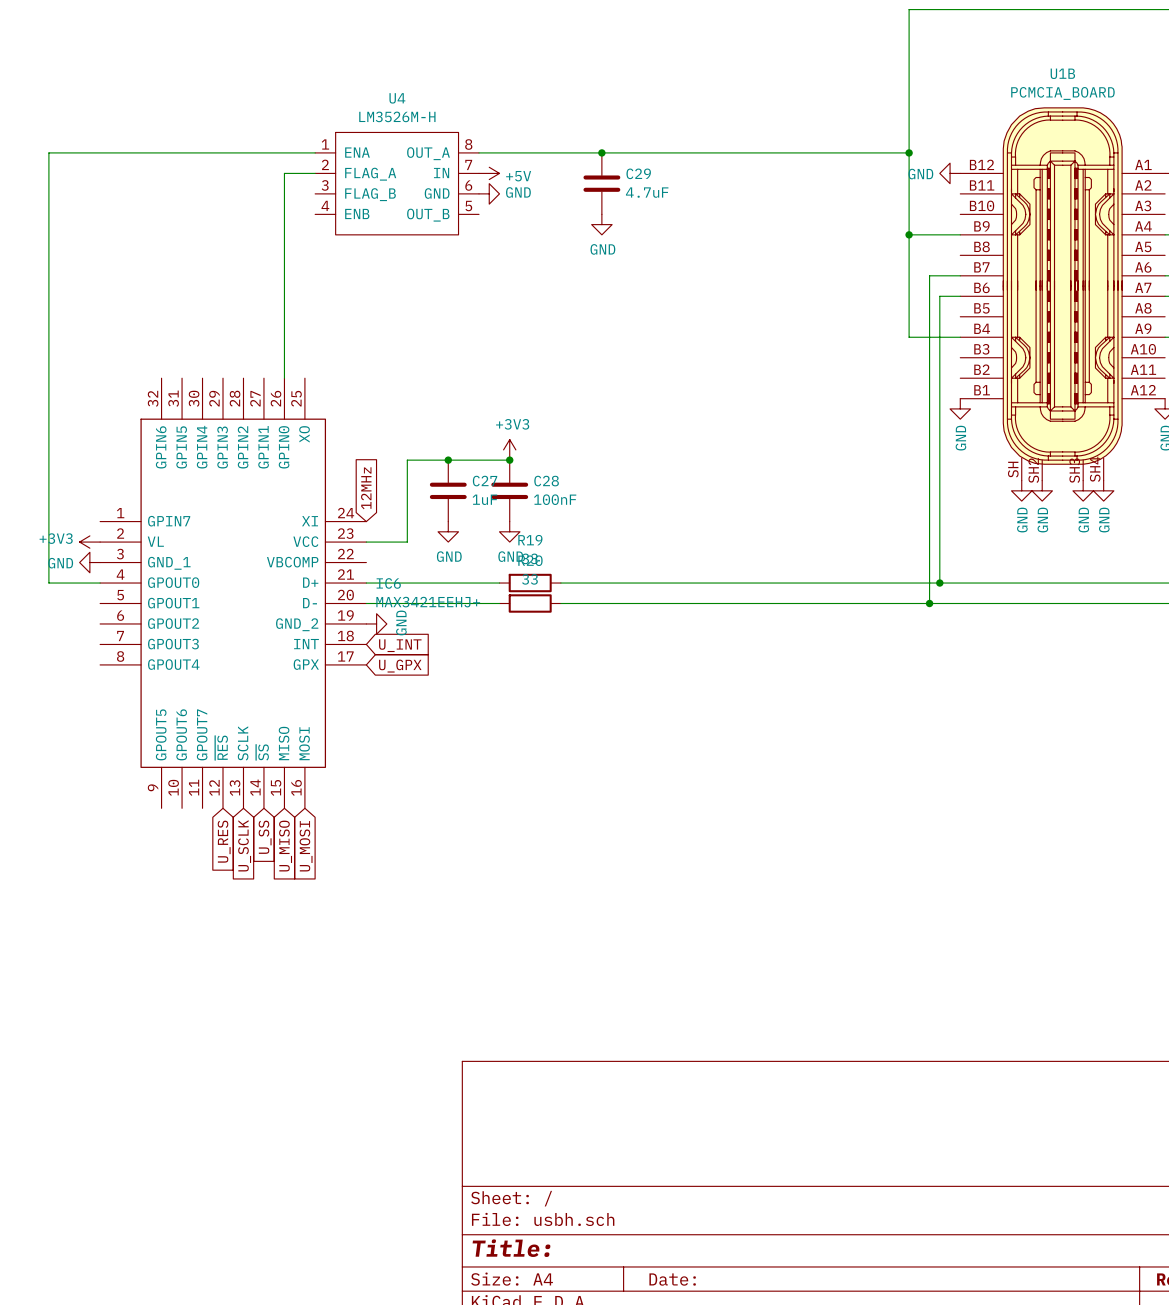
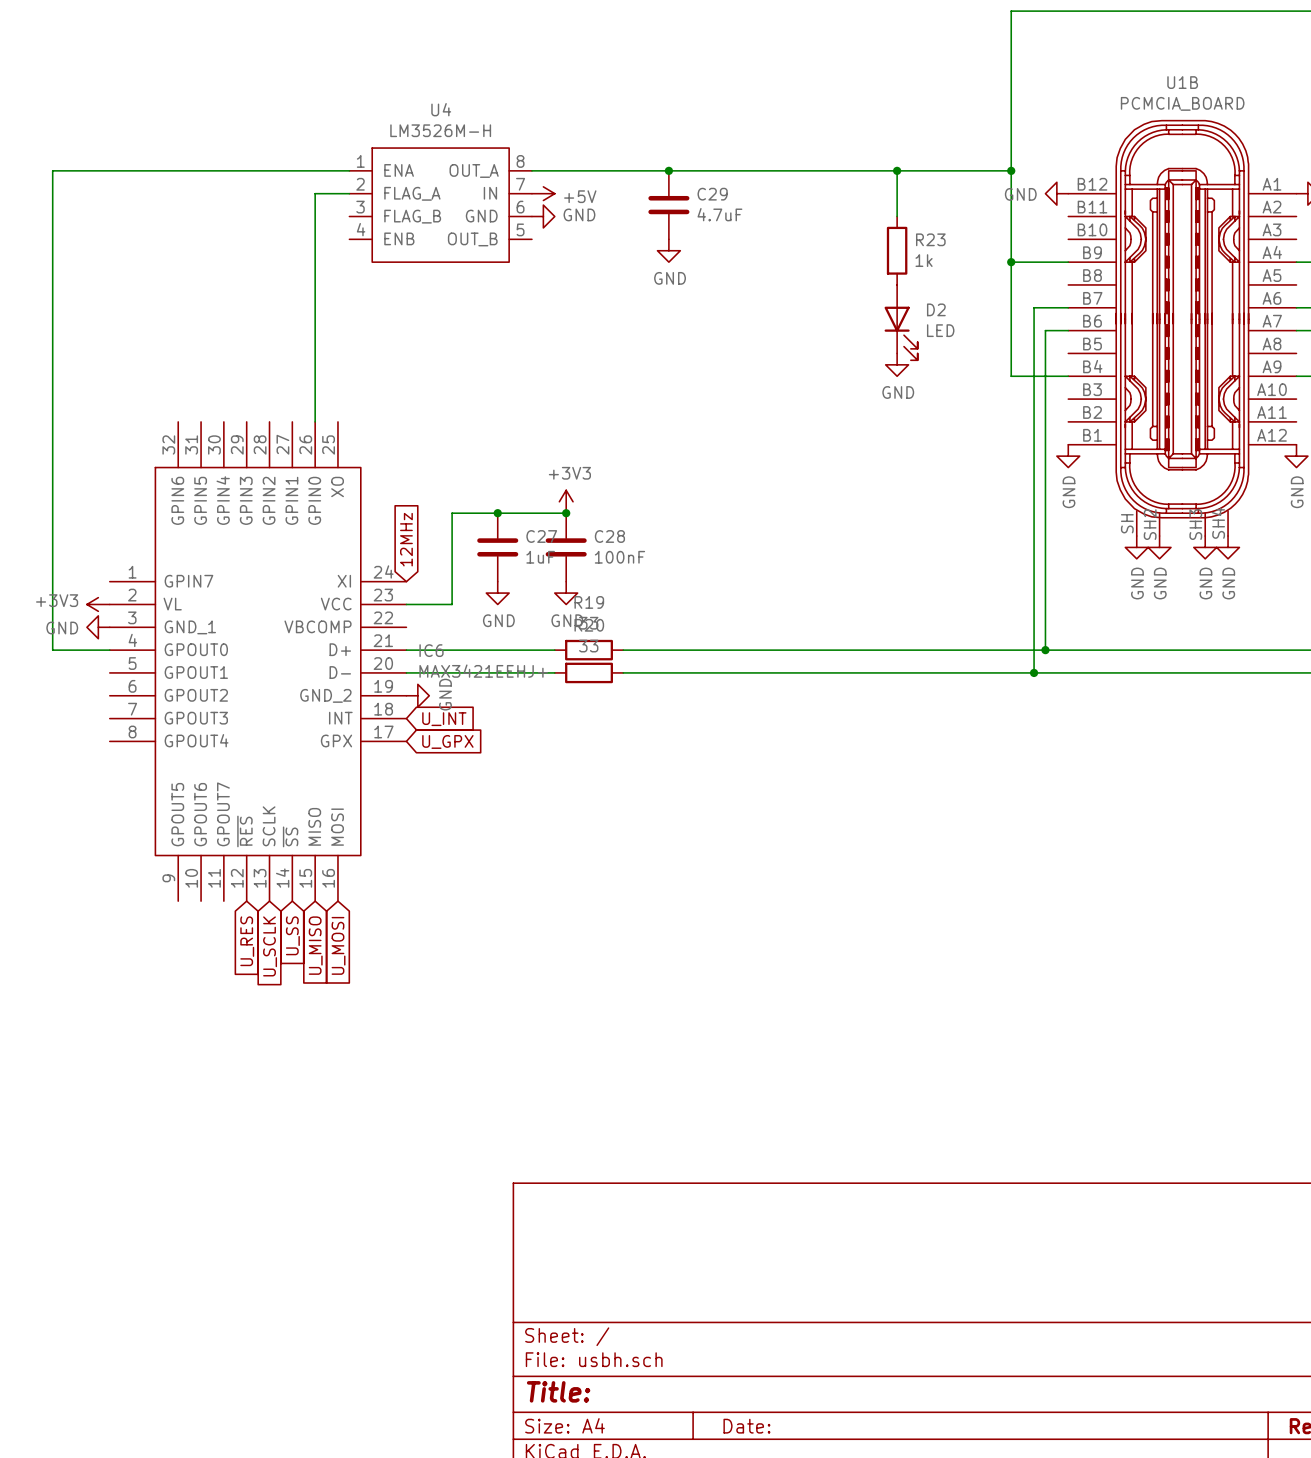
wire: none -> (897, 170) (897, 216)
junction: none -> (897, 170)
R23: none -> 1k (897, 250)
D2: none -> LED (901, 322)
power symbol: none -> GND (897, 364)

